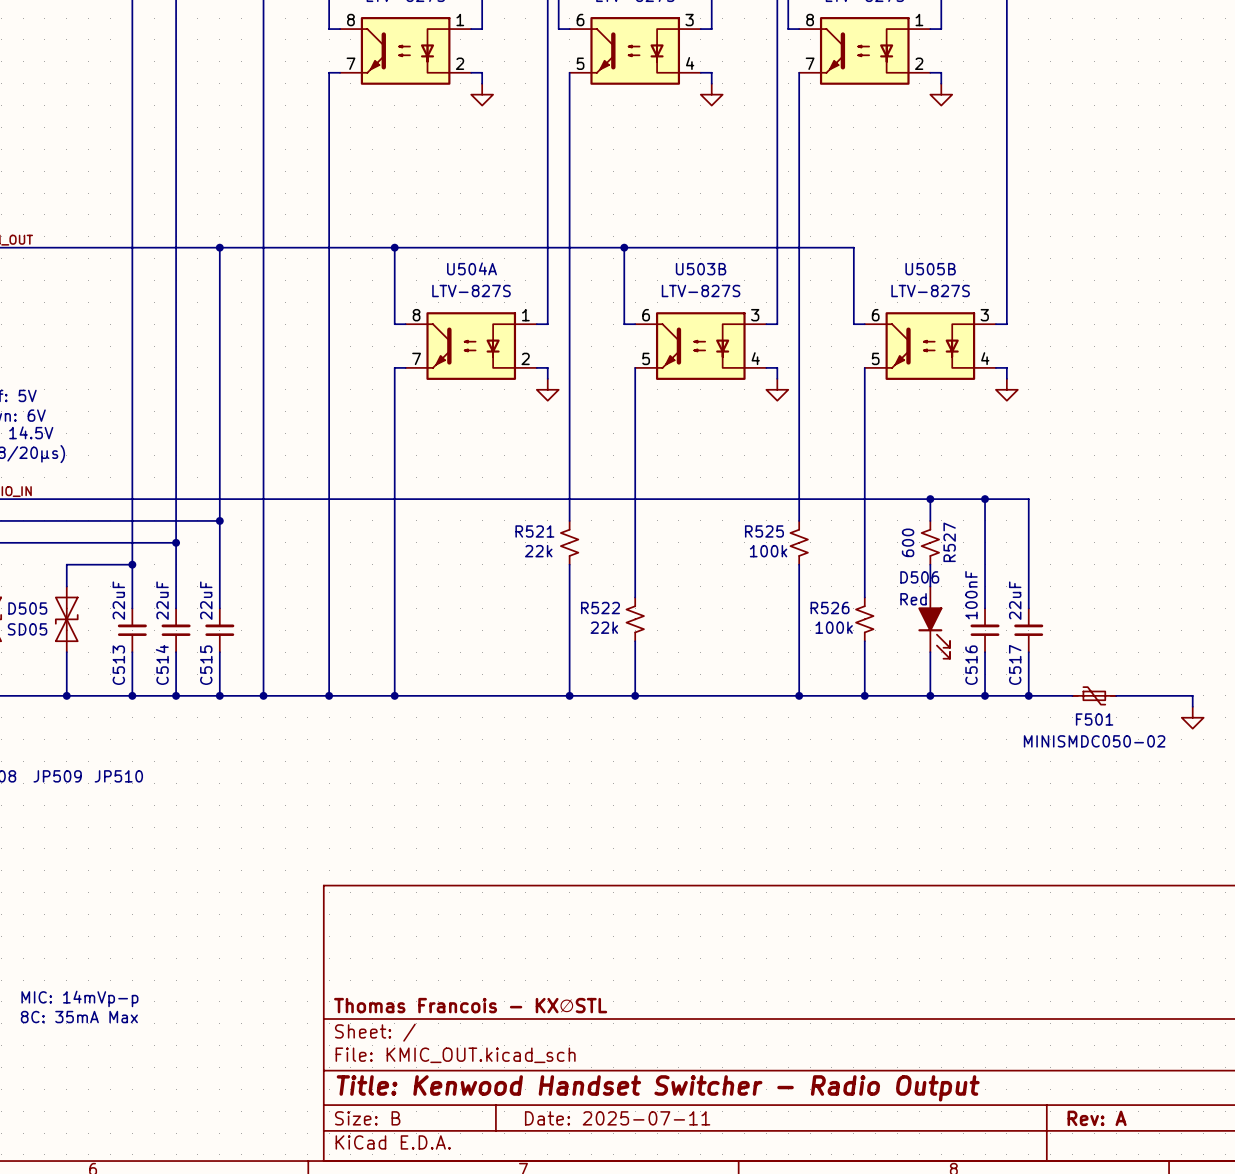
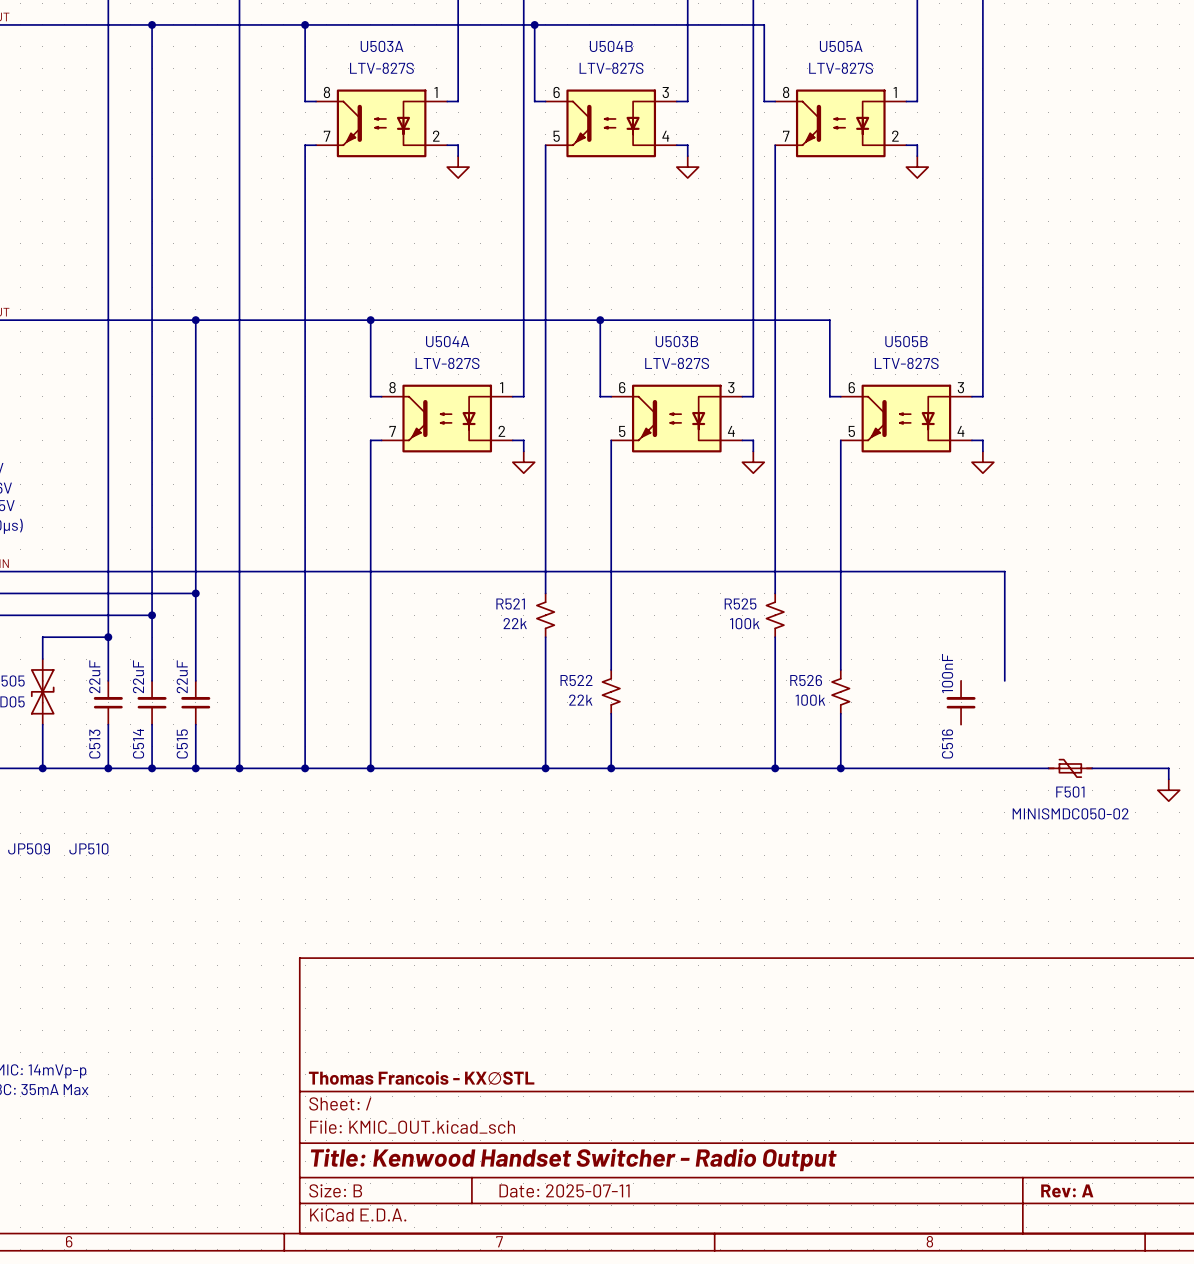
wire: (930, 499) (930, 520) -> none
junction: (930, 499) -> none
wire: (985, 499) (985, 608) -> none
junction: (985, 499) -> none
R527: 600 (930, 542) -> none
wire: (930, 564) (930, 586) -> none
D506: Red (934, 622) -> none
C517: 22uF (1028, 630) -> none
wire: (930, 652) (930, 695) -> none
wire: (985, 652) (985, 695) -> none
wire: (1028, 652) (1028, 695) -> none
junction: (930, 695) -> none
junction: (985, 695) -> none
junction: (1028, 695) -> none

